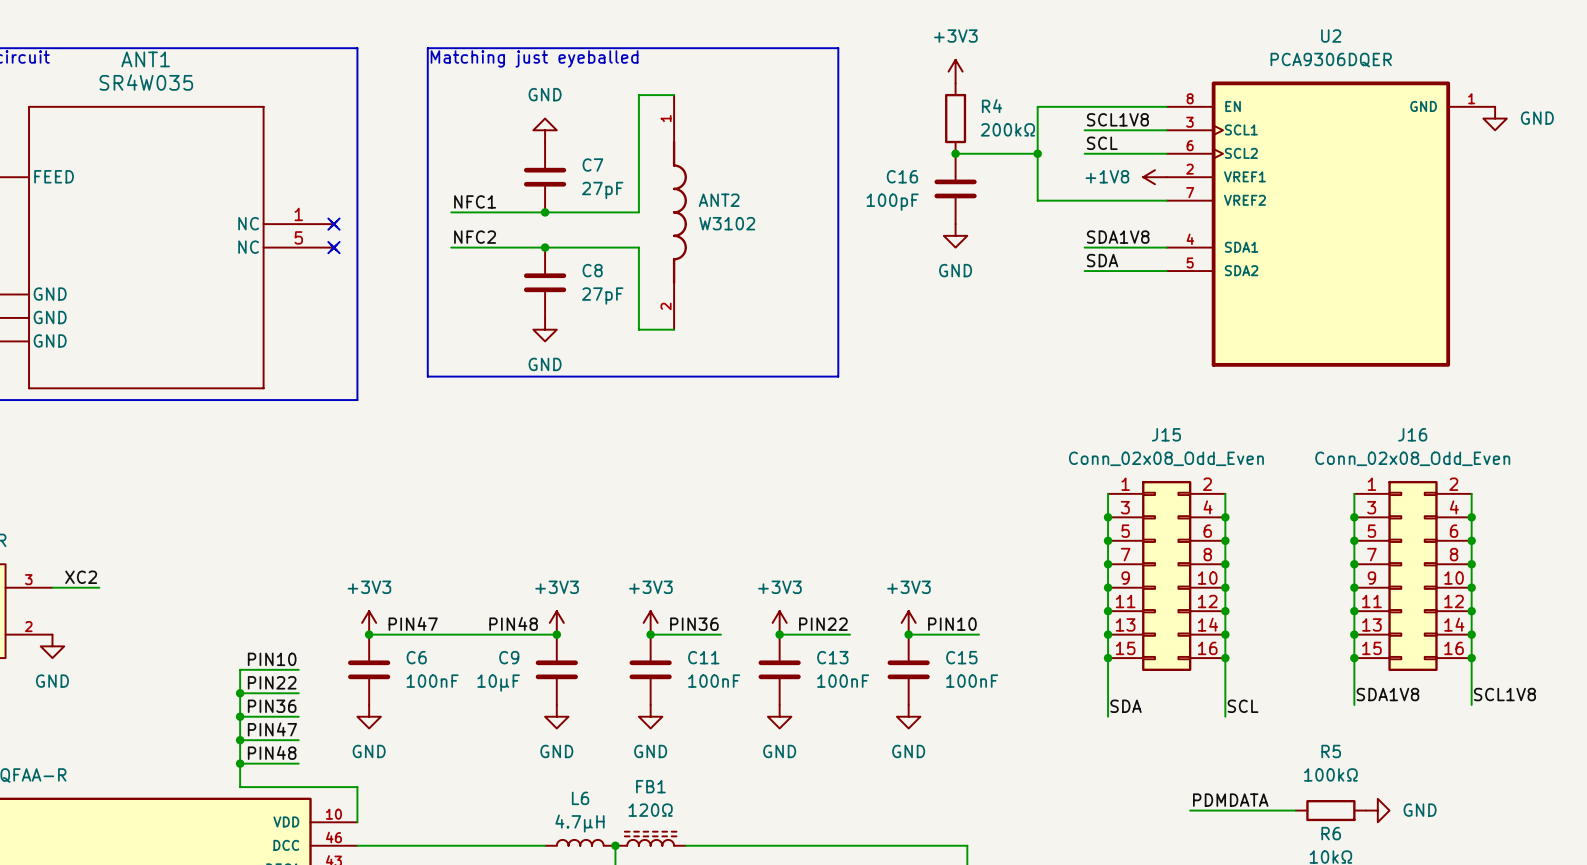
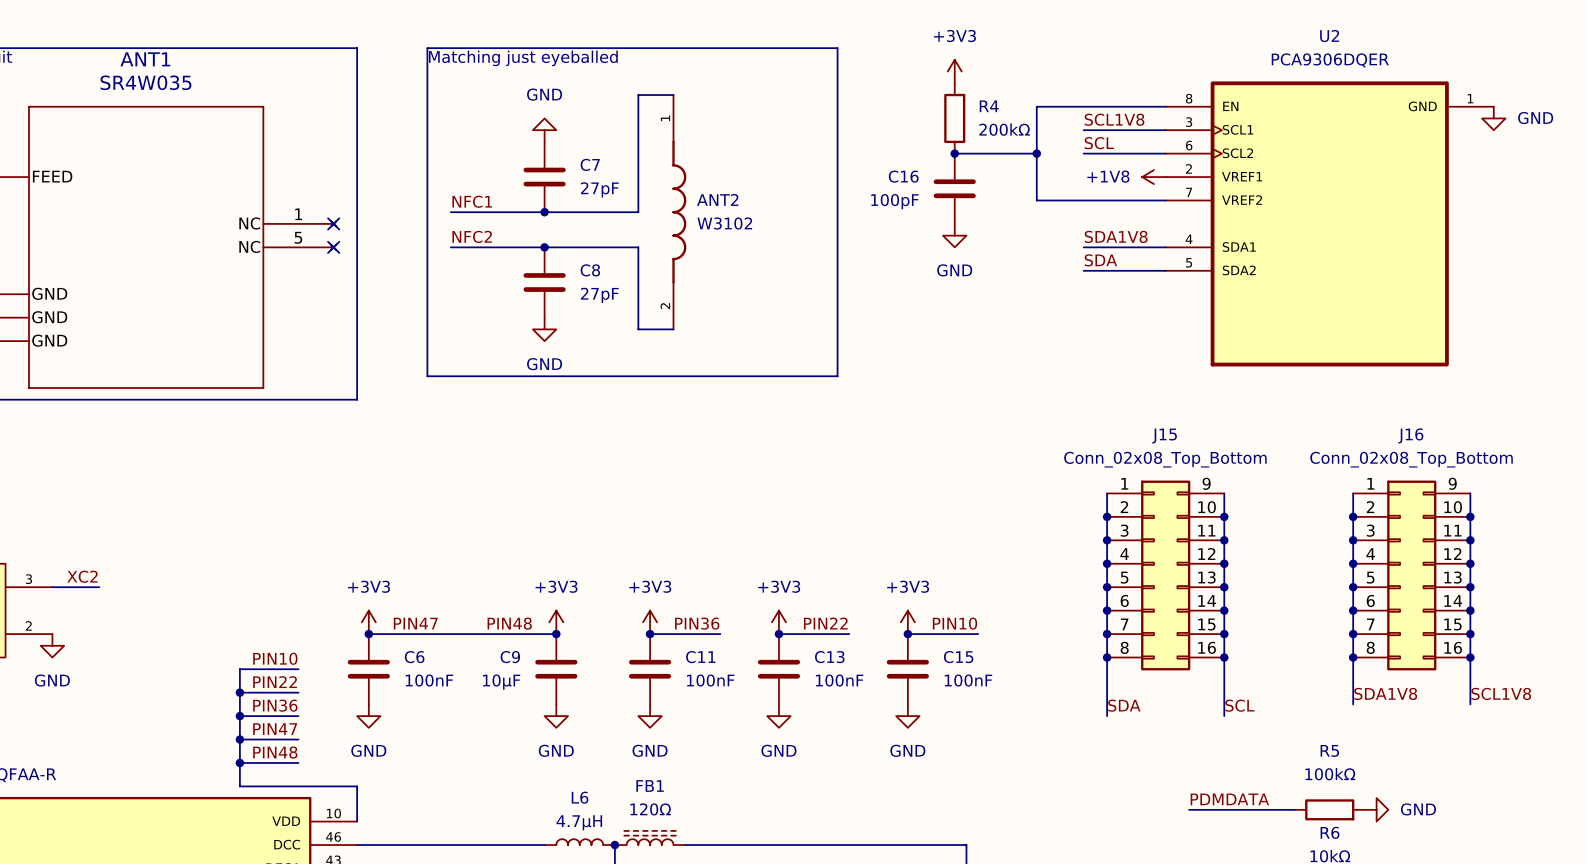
J15 value: Conn_02x08_Odd_Even (1166, 458) -> Conn_02x08_Top_Bottom (1165, 459)
J16 value: Conn_02x08_Odd_Even (1412, 458) -> Conn_02x08_Top_Bottom (1411, 459)
J15 symbol: [1108, 480, 1226, 671] -> [1107, 480, 1225, 671]
J16 symbol: [1354, 480, 1472, 671] -> [1353, 480, 1471, 671]

